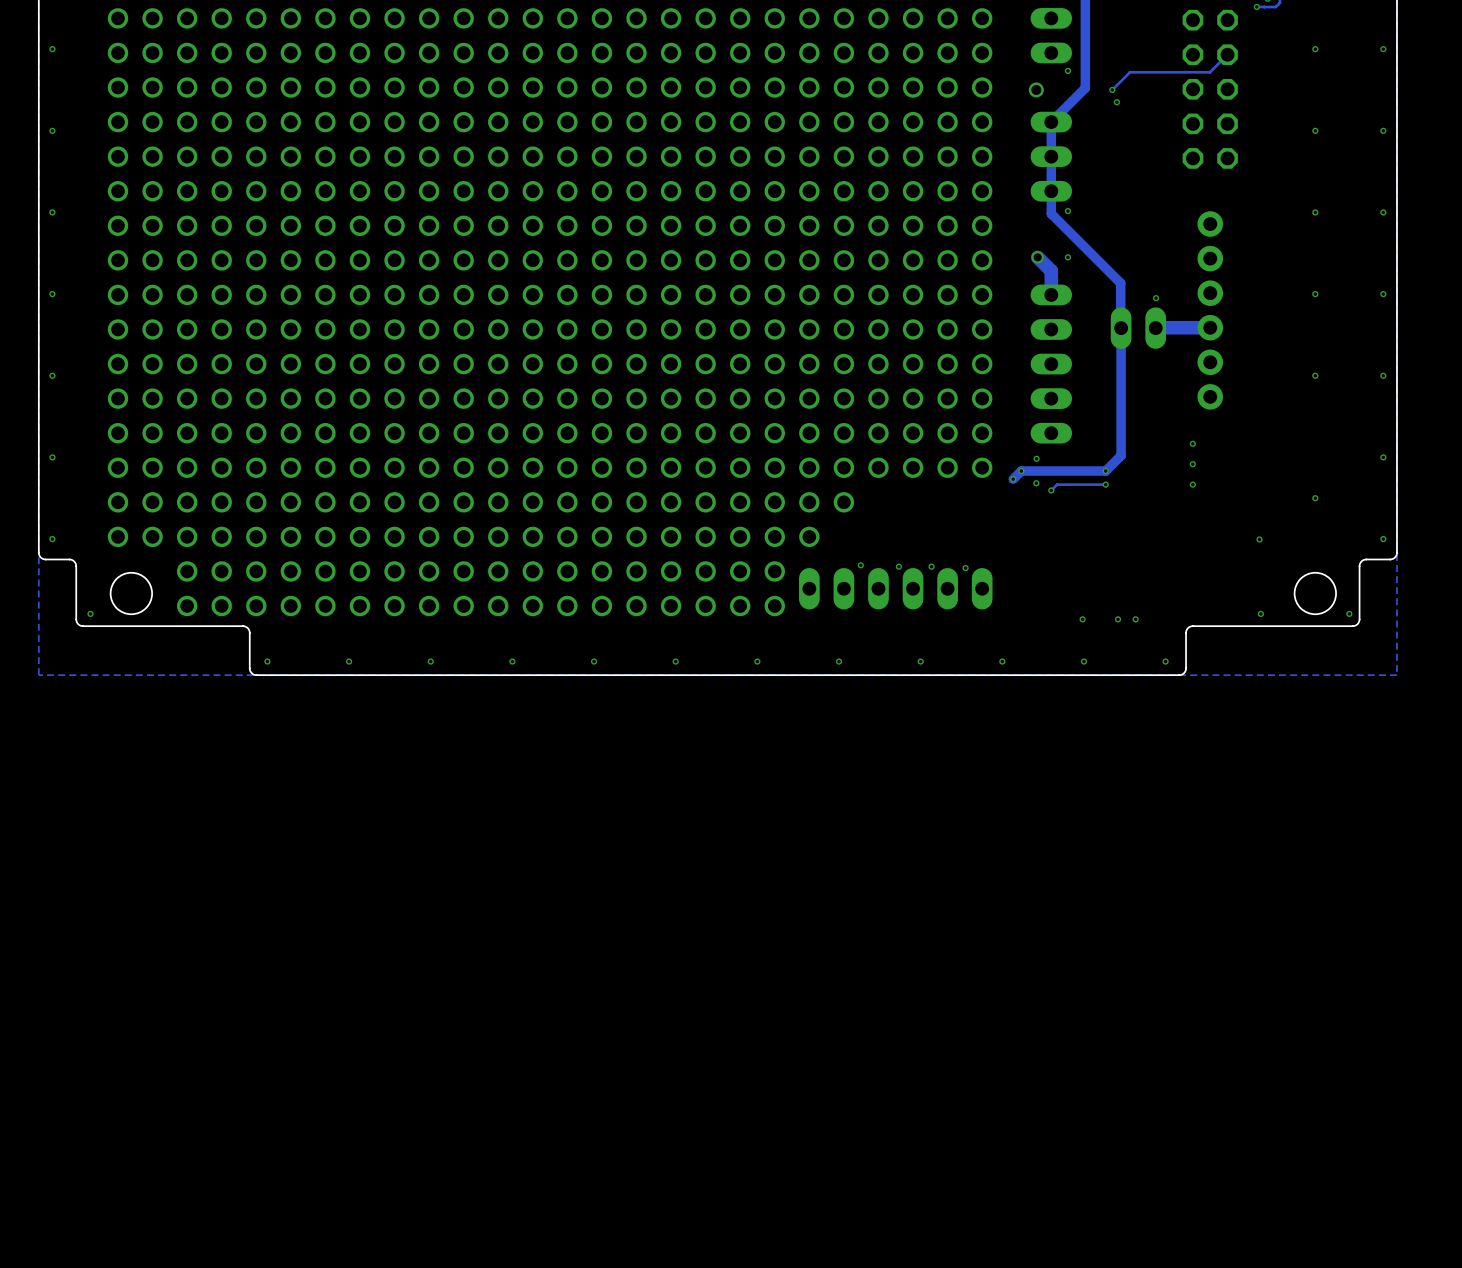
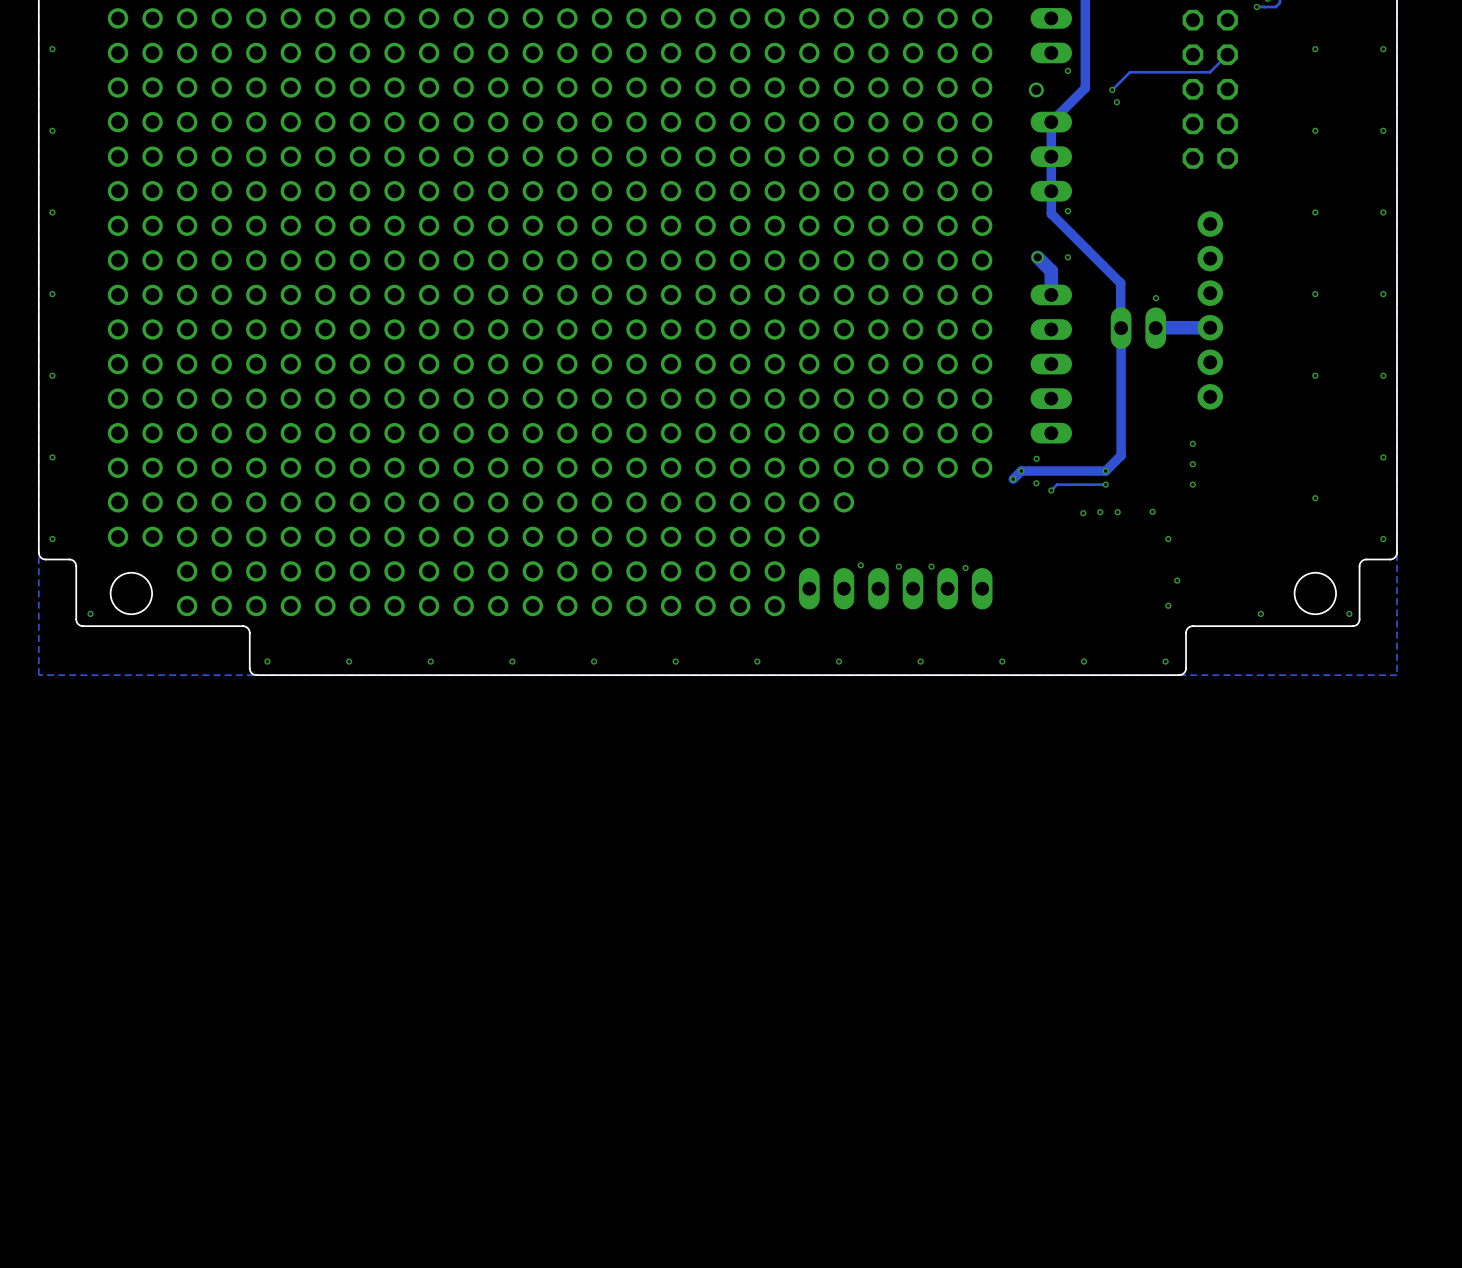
via: none -> (1152, 511)
via: none -> (1100, 512)
via: none -> (1117, 512)
via: none -> (1083, 513)
via: none -> (1168, 539)
via: (1259, 539) -> none
via: none -> (1177, 580)
via: none -> (1168, 605)
via: (1082, 619) -> none
via: (1117, 619) -> none
via: (1135, 619) -> none

